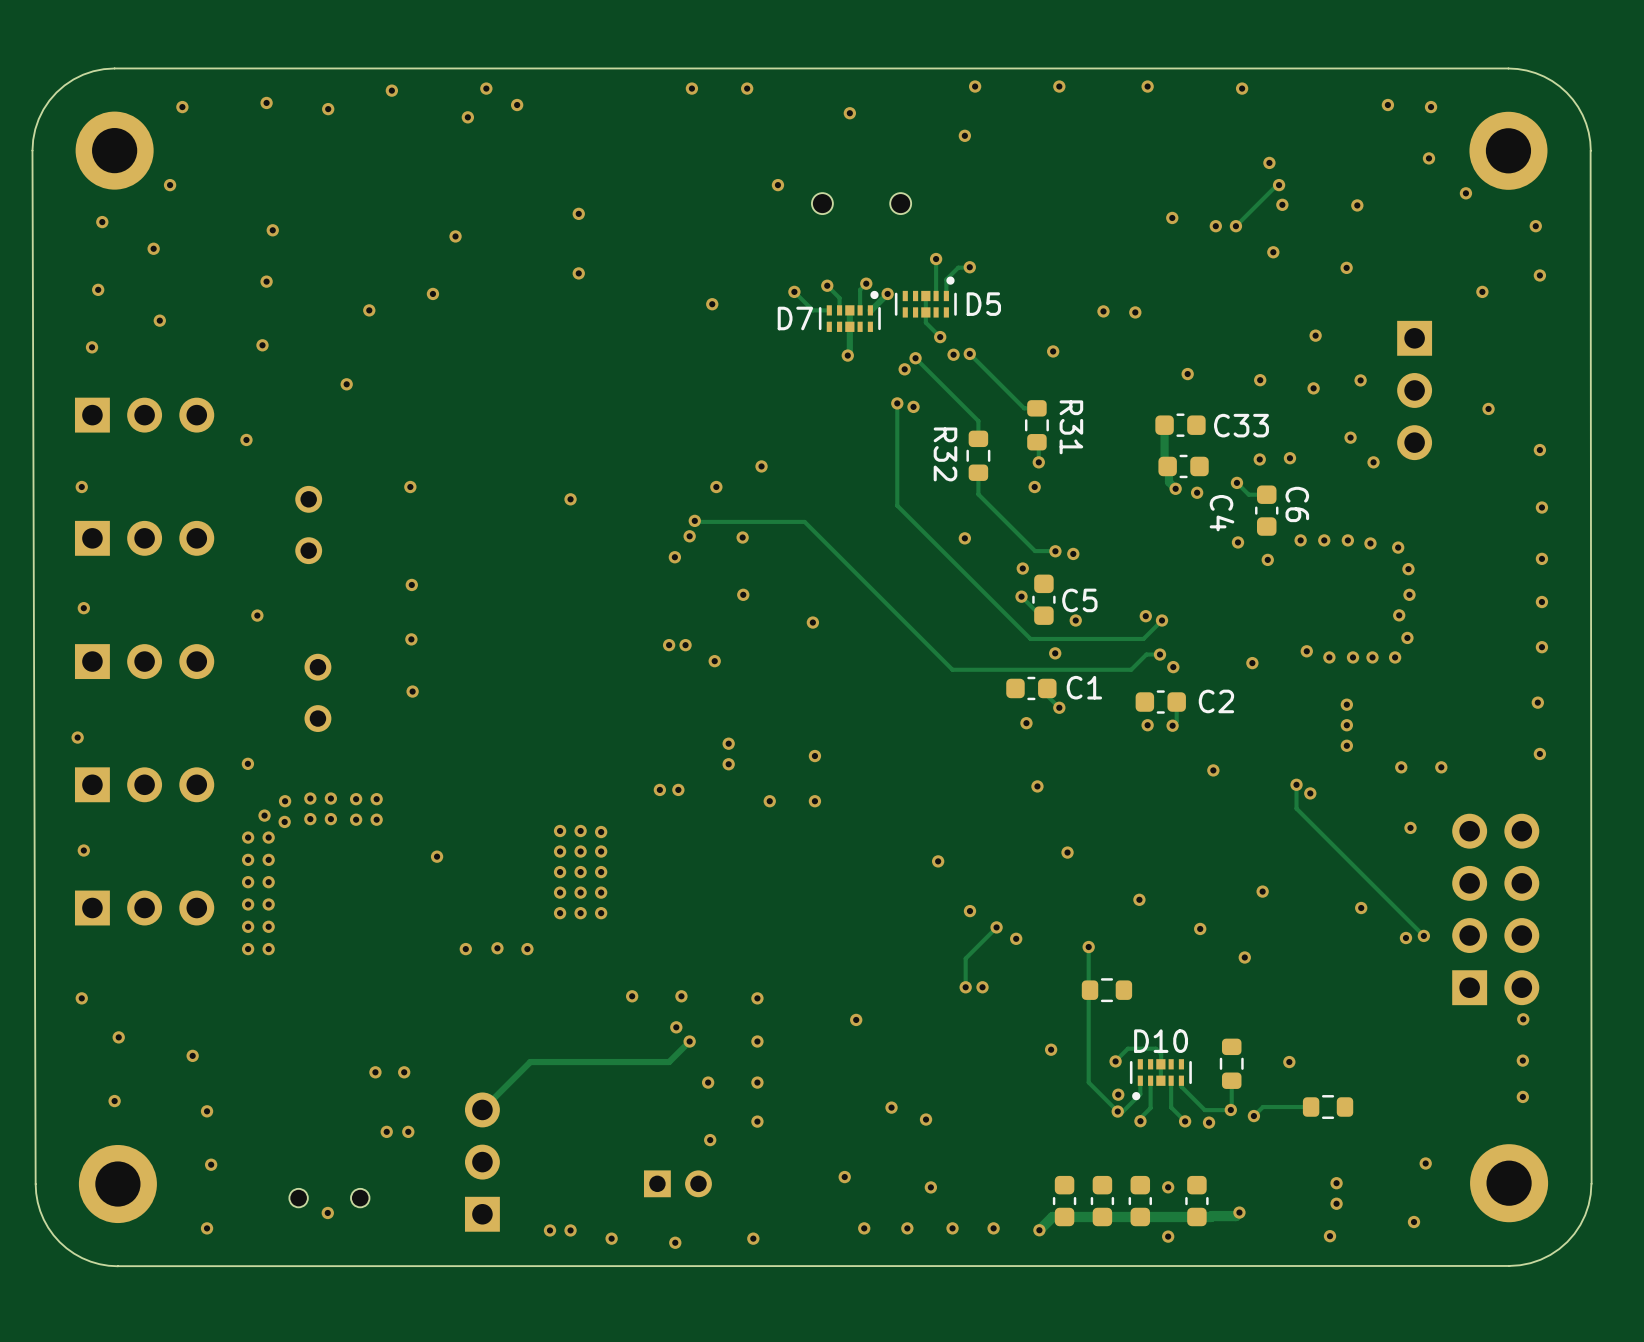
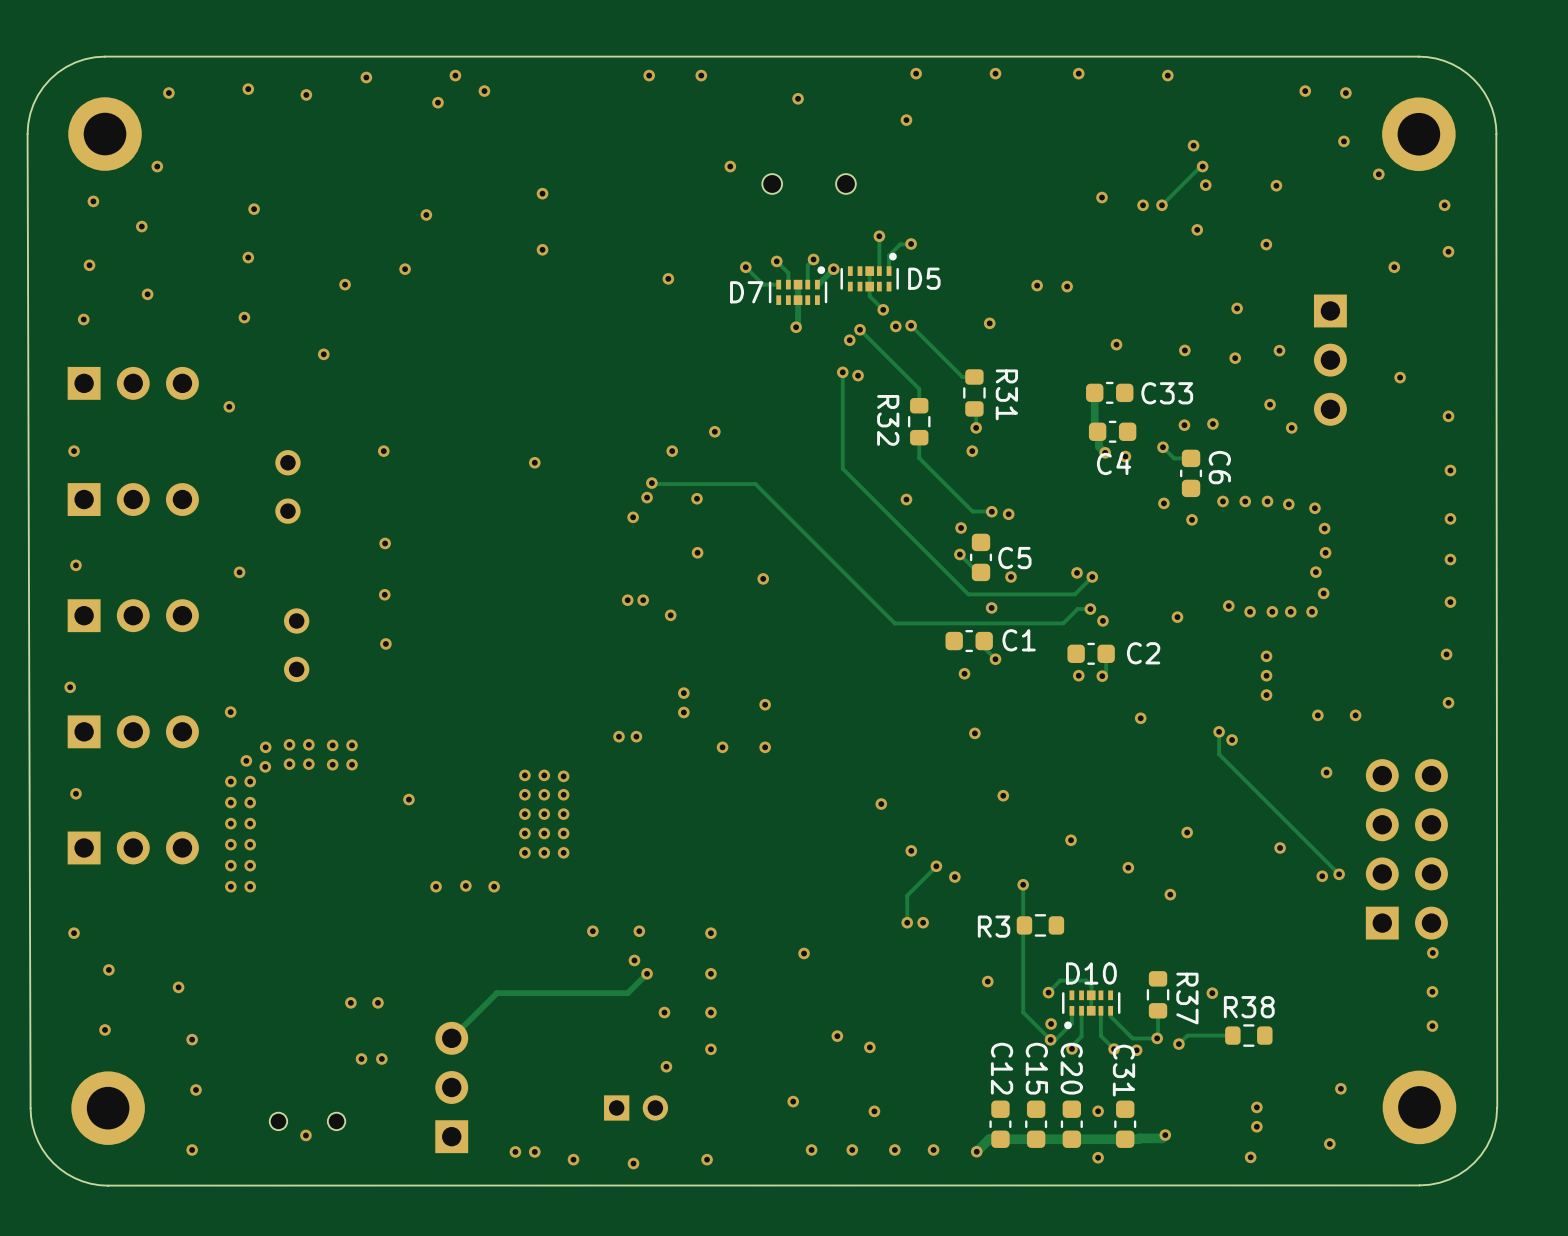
C4 name rotation: 0° (1222, 513) -> 90° counterclockwise (1114, 463)
R3 name: none -> R3 (994, 926)
R37 name: none -> R37 (1187, 998)
R38 name: none -> R38 (1249, 1007)
C12 name: none -> C12 (1002, 1068)
C15 name: none -> C15 (1036, 1068)
C20 name: none -> C20 (1071, 1068)
C31 name: none -> C31 (1124, 1070)

